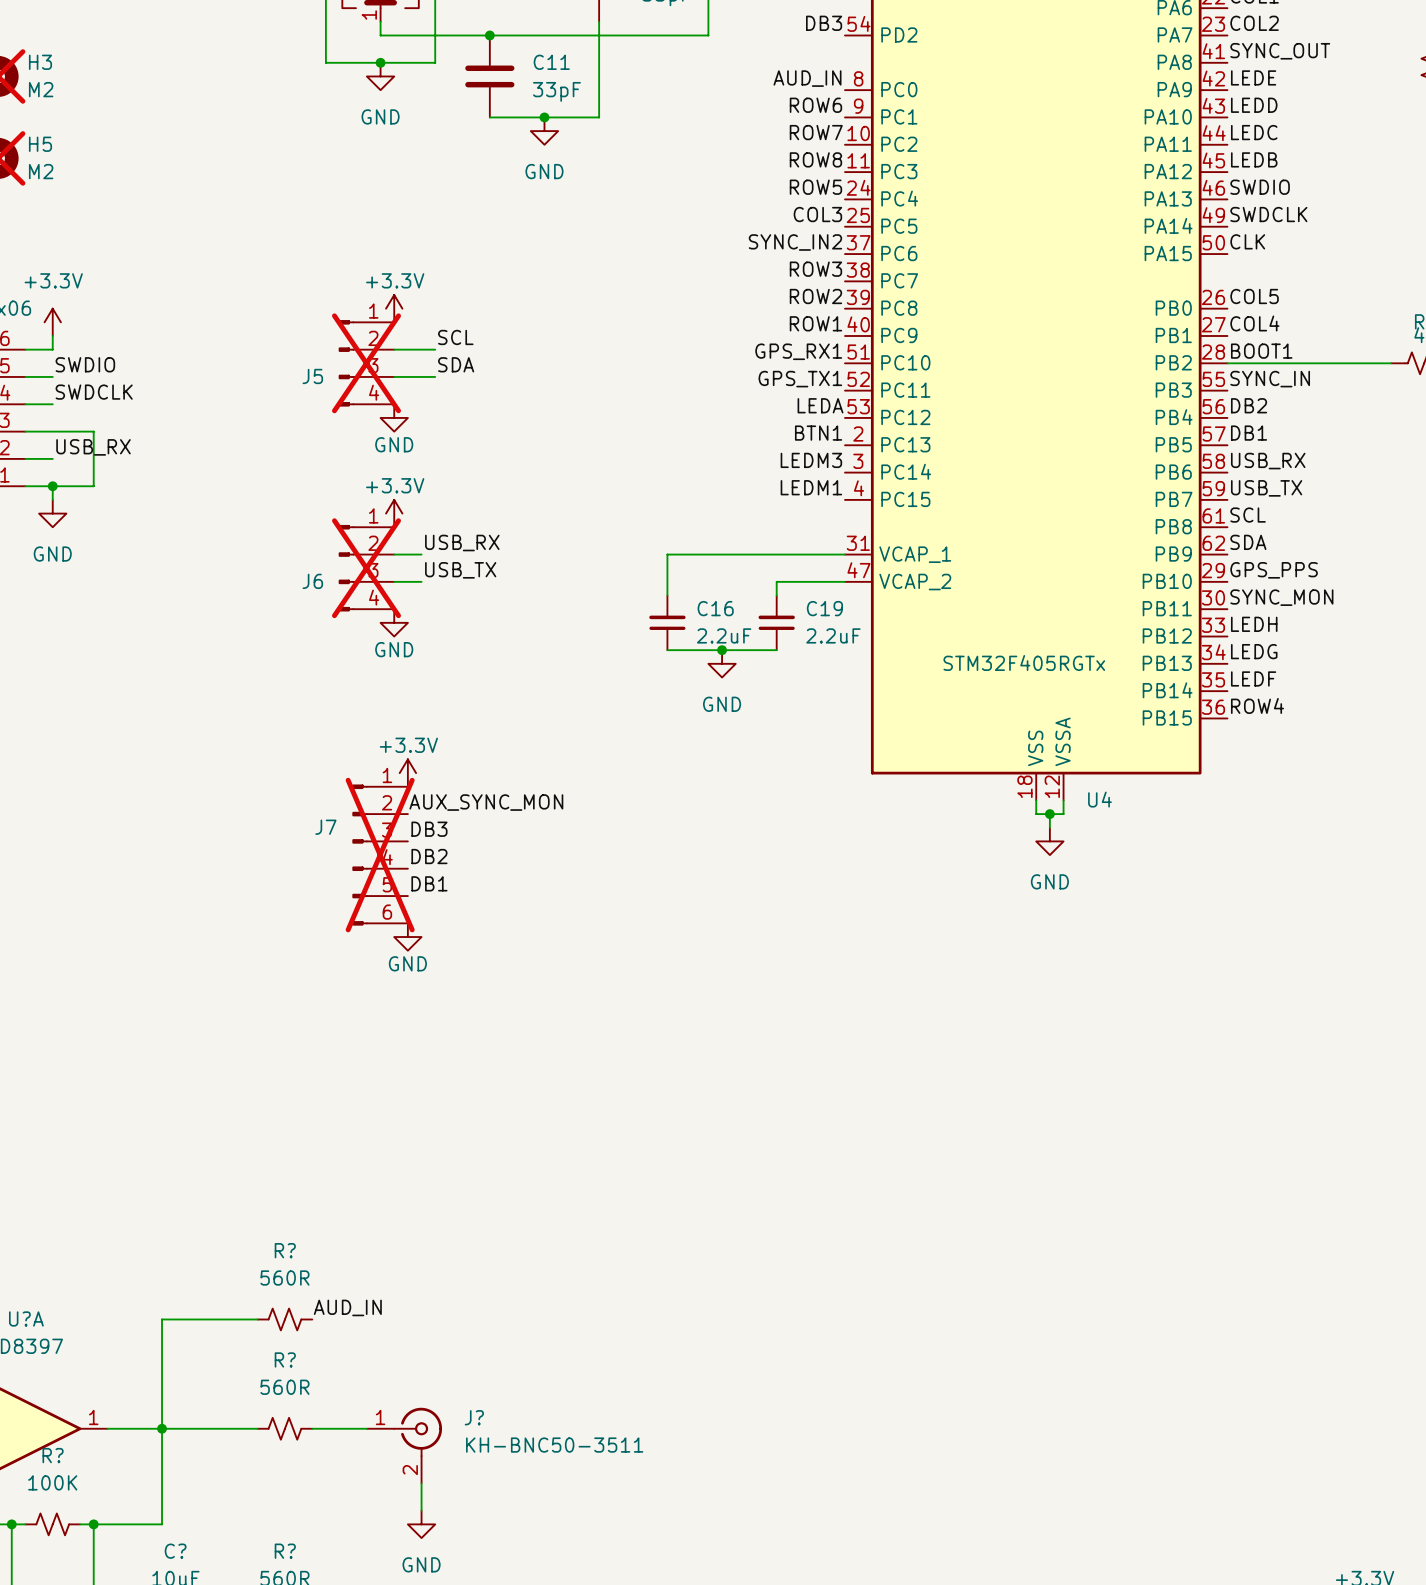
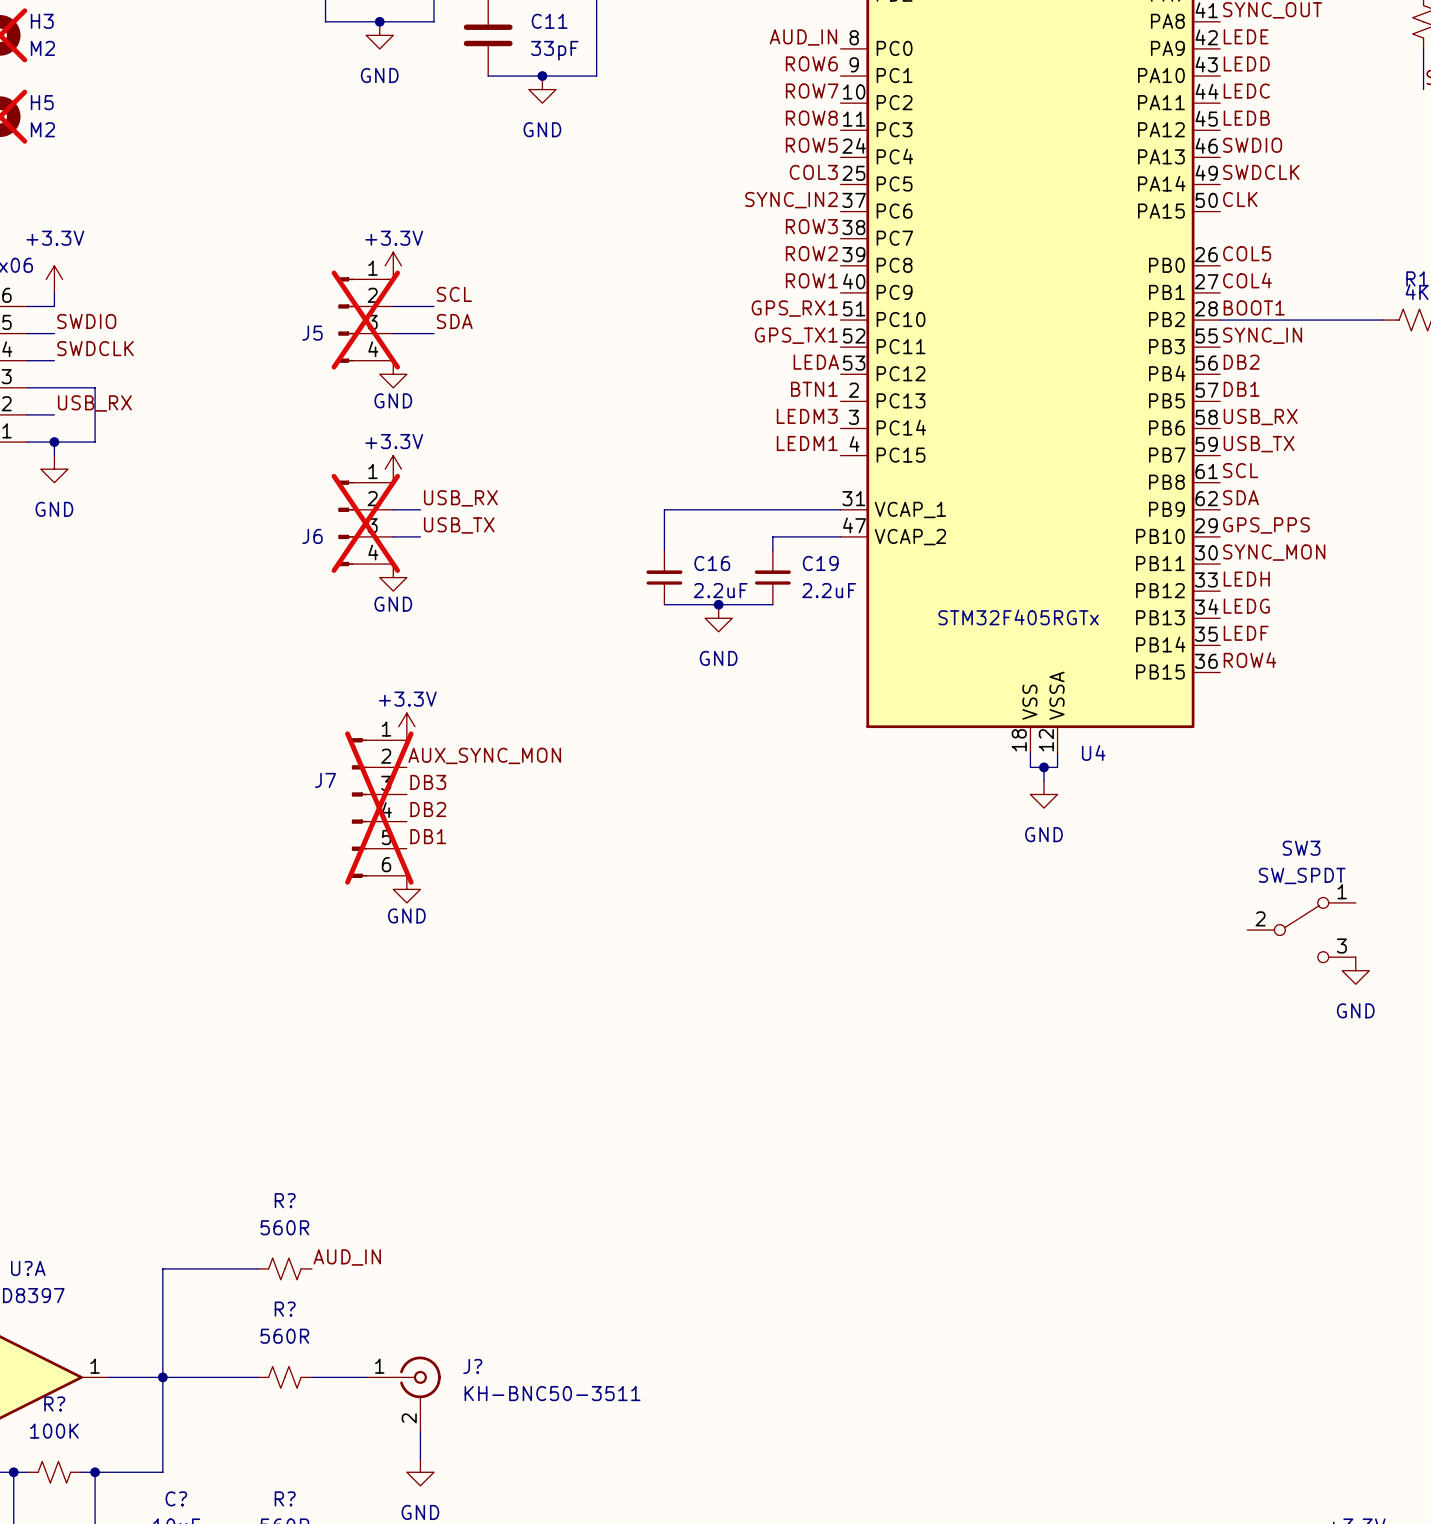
SW3: none -> SW_SPDT (1301, 930)
power symbol: none -> GND (1355, 970)

